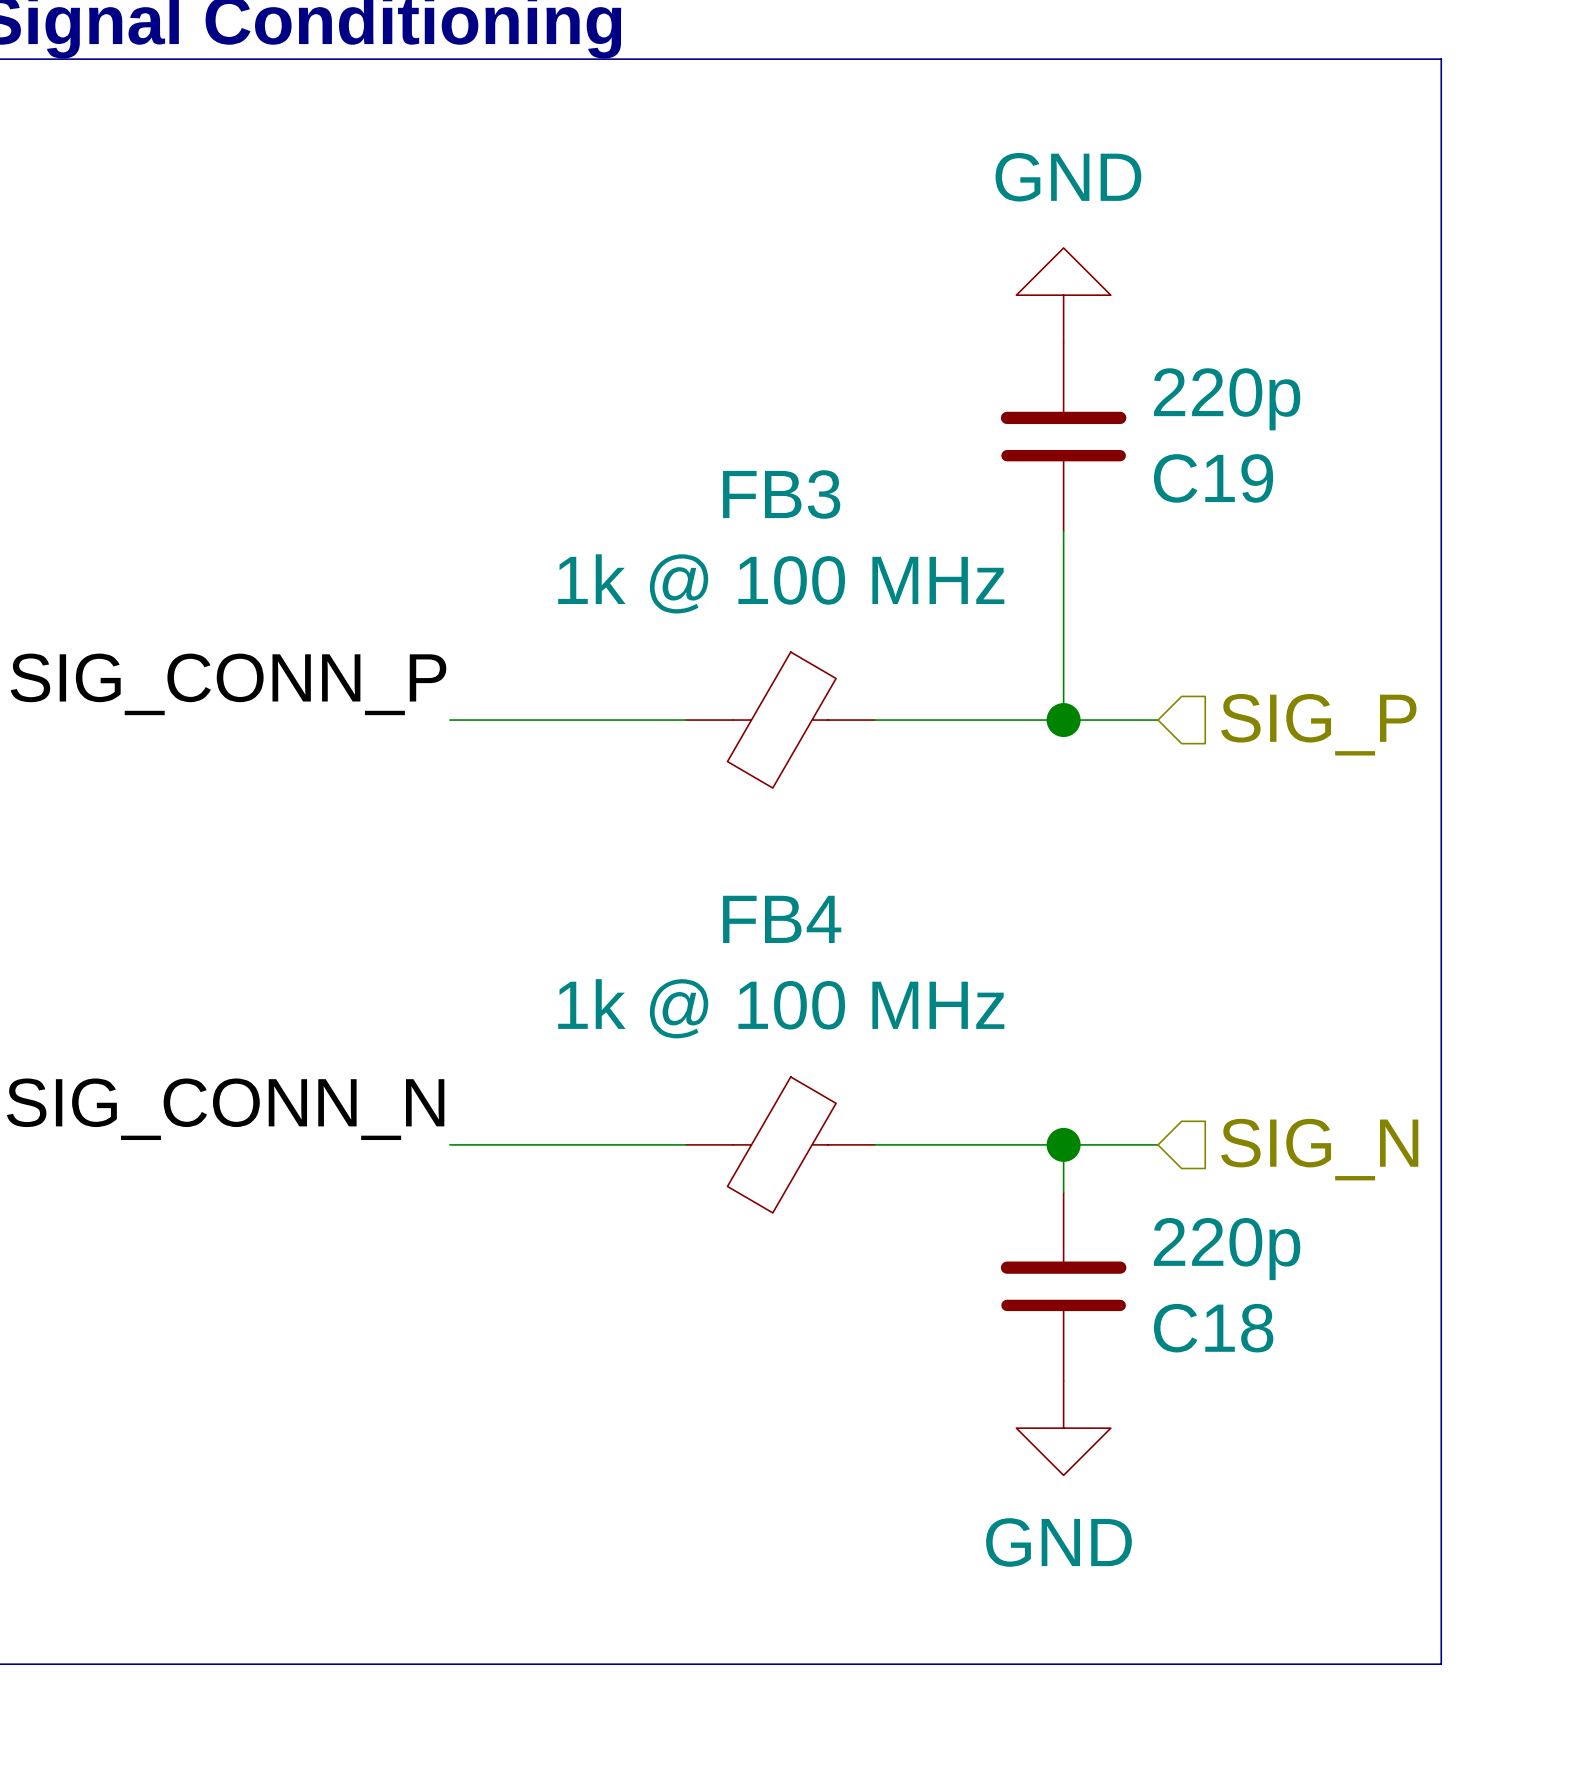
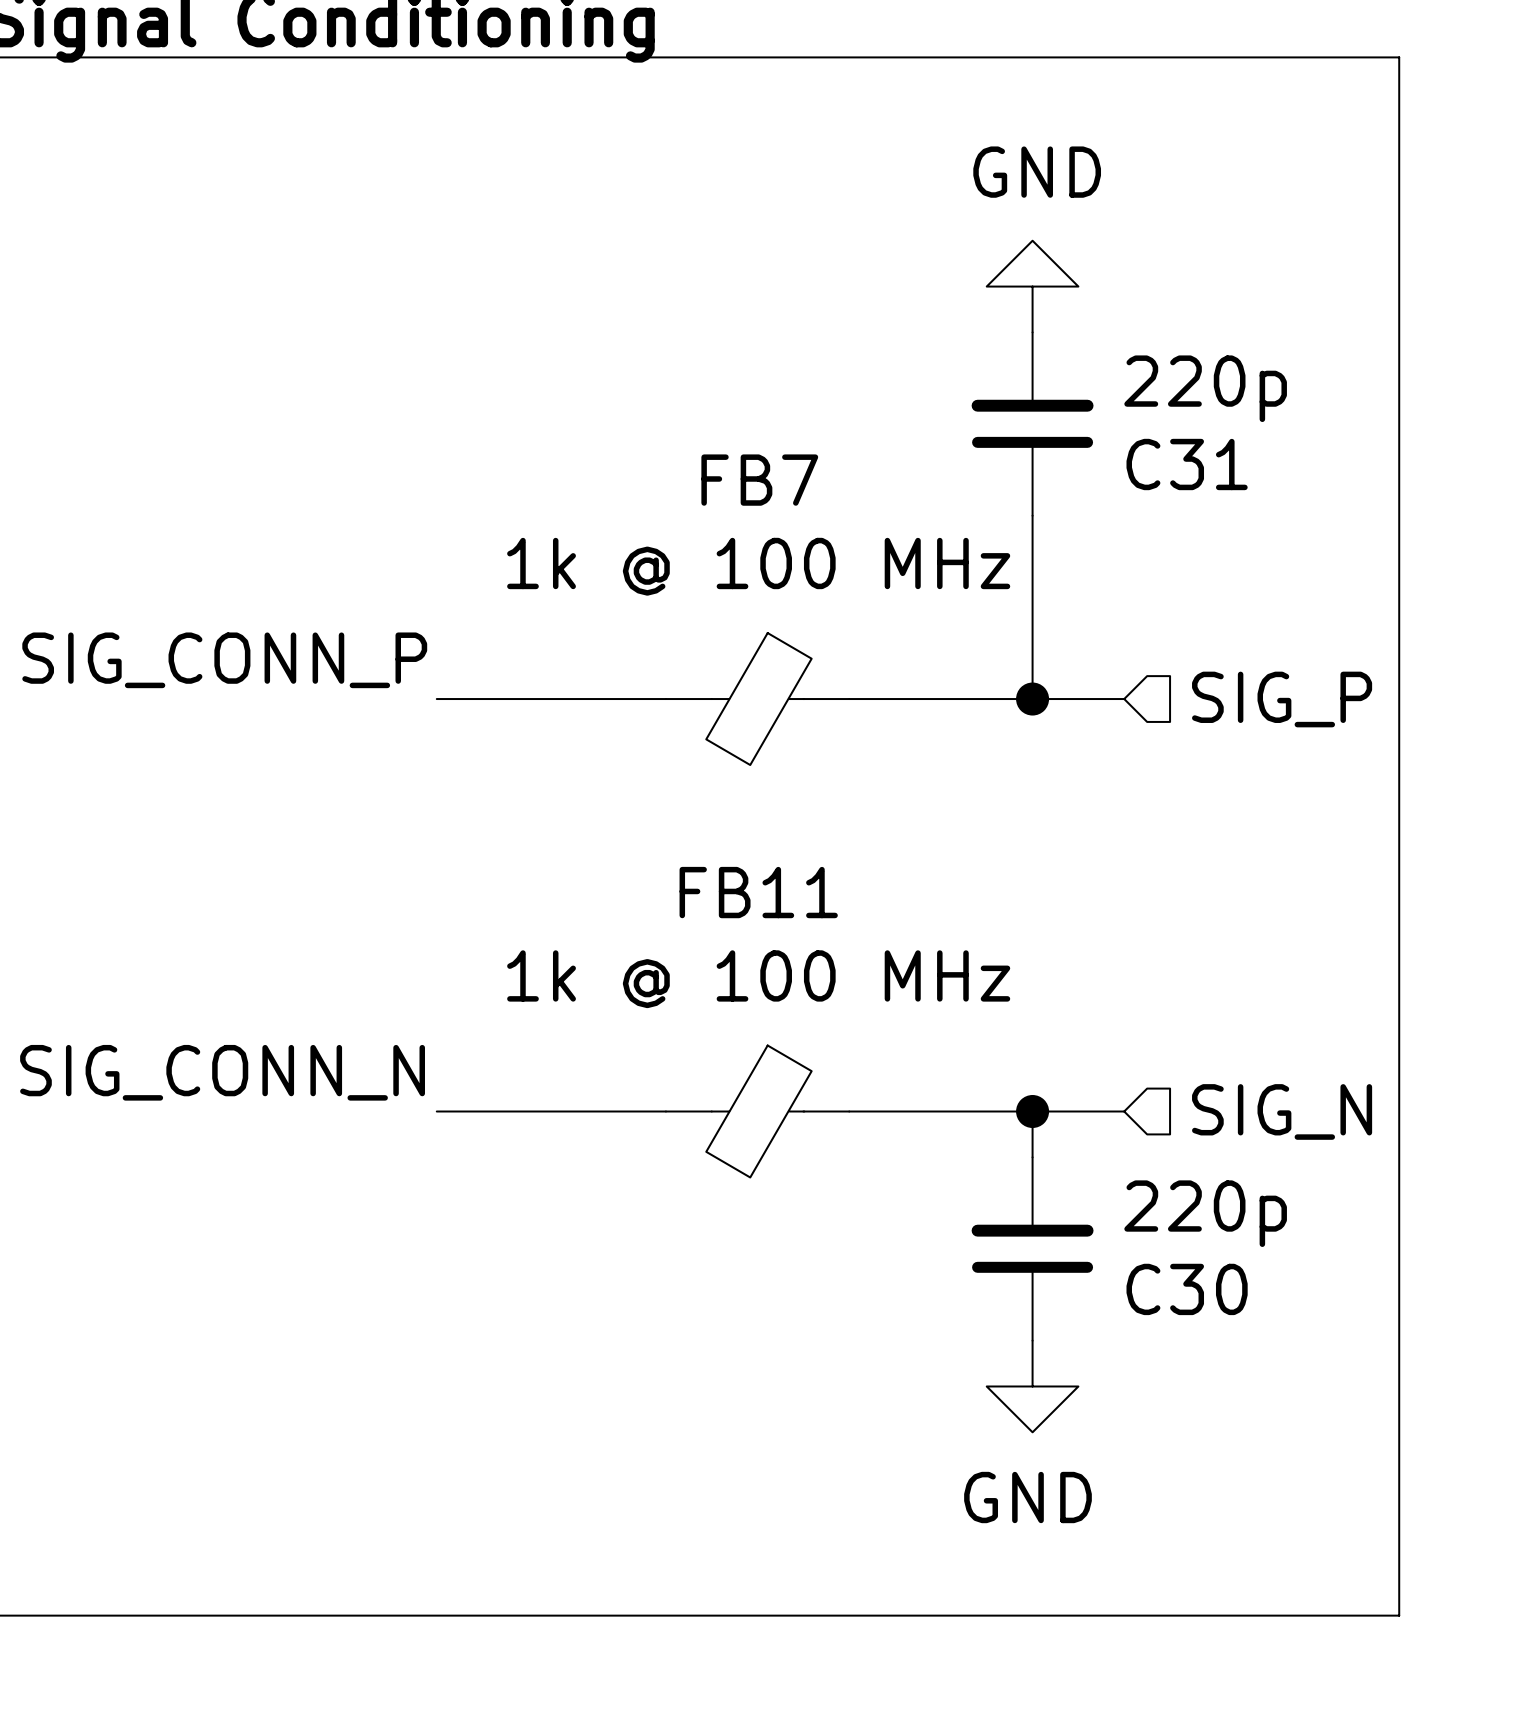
C19 name: C19 (1213, 478) -> C31 (1187, 464)
FB3 name: FB3 (781, 494) -> FB7 (759, 480)
FB4 name: FB4 (782, 919) -> FB11 (758, 892)
C18 name: C18 (1213, 1328) -> C30 (1187, 1289)

